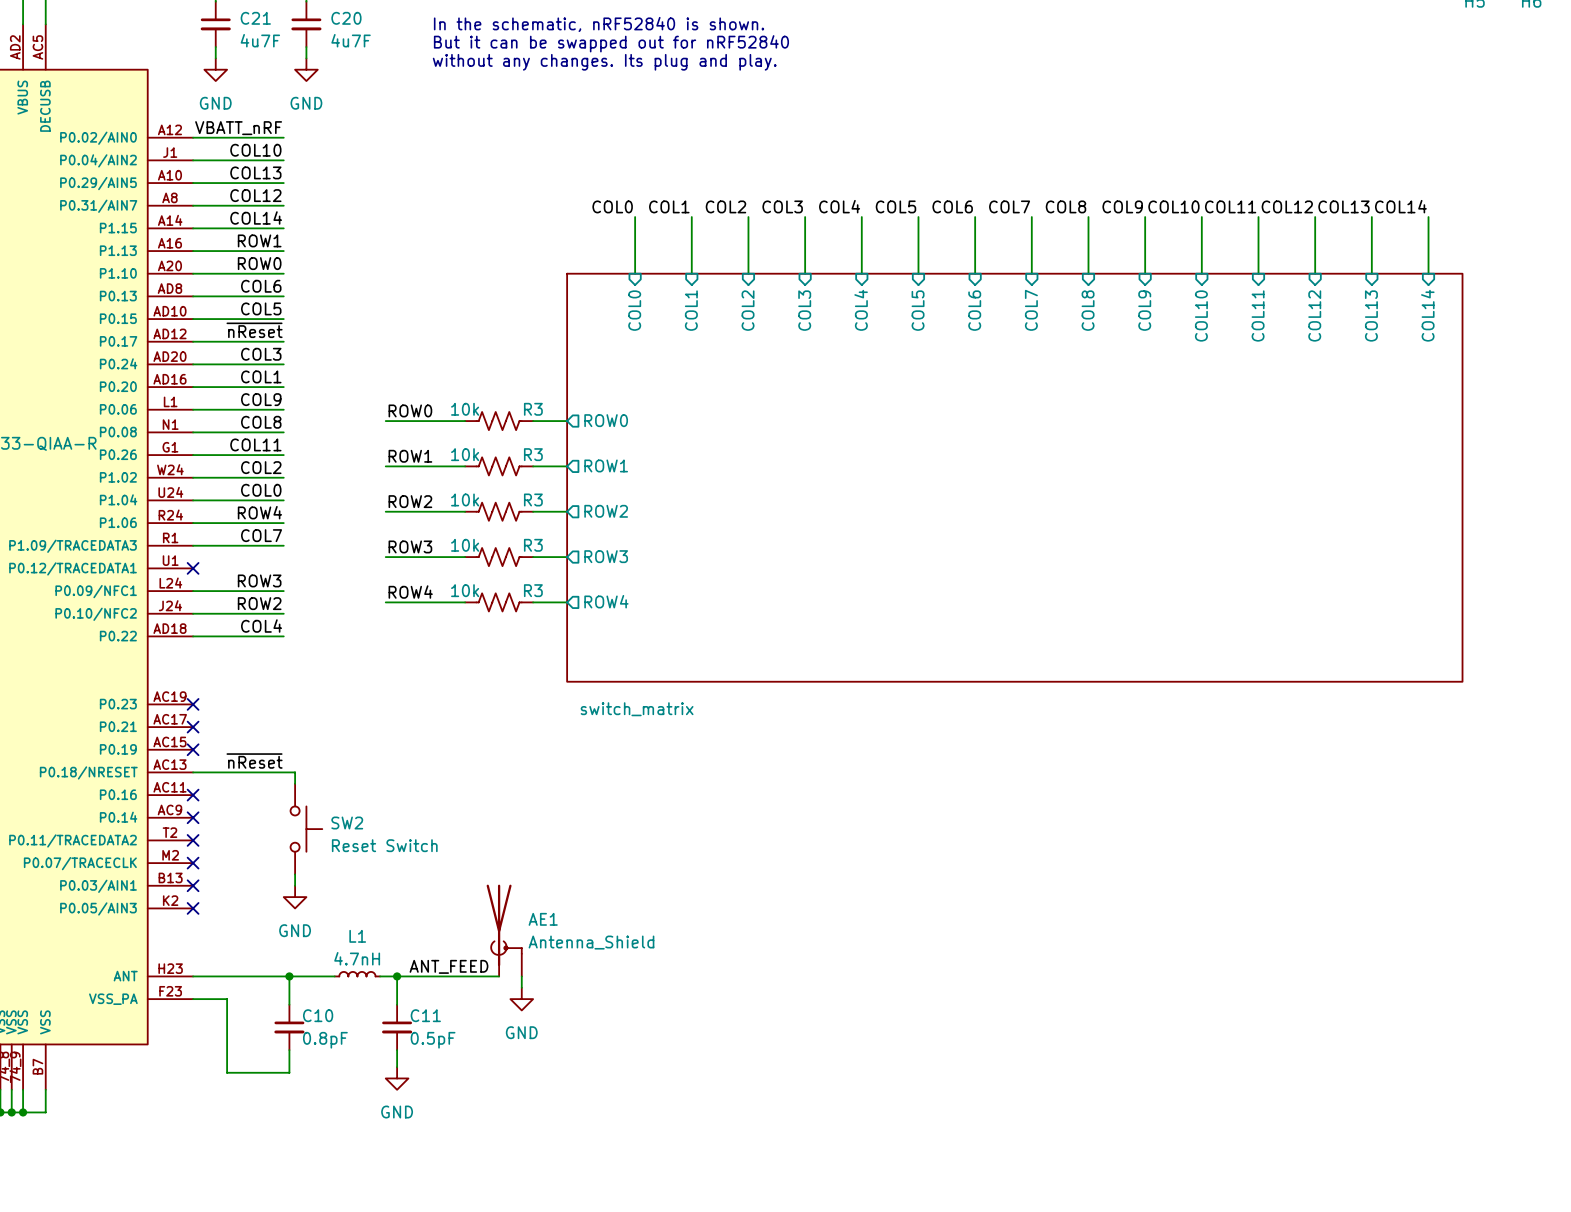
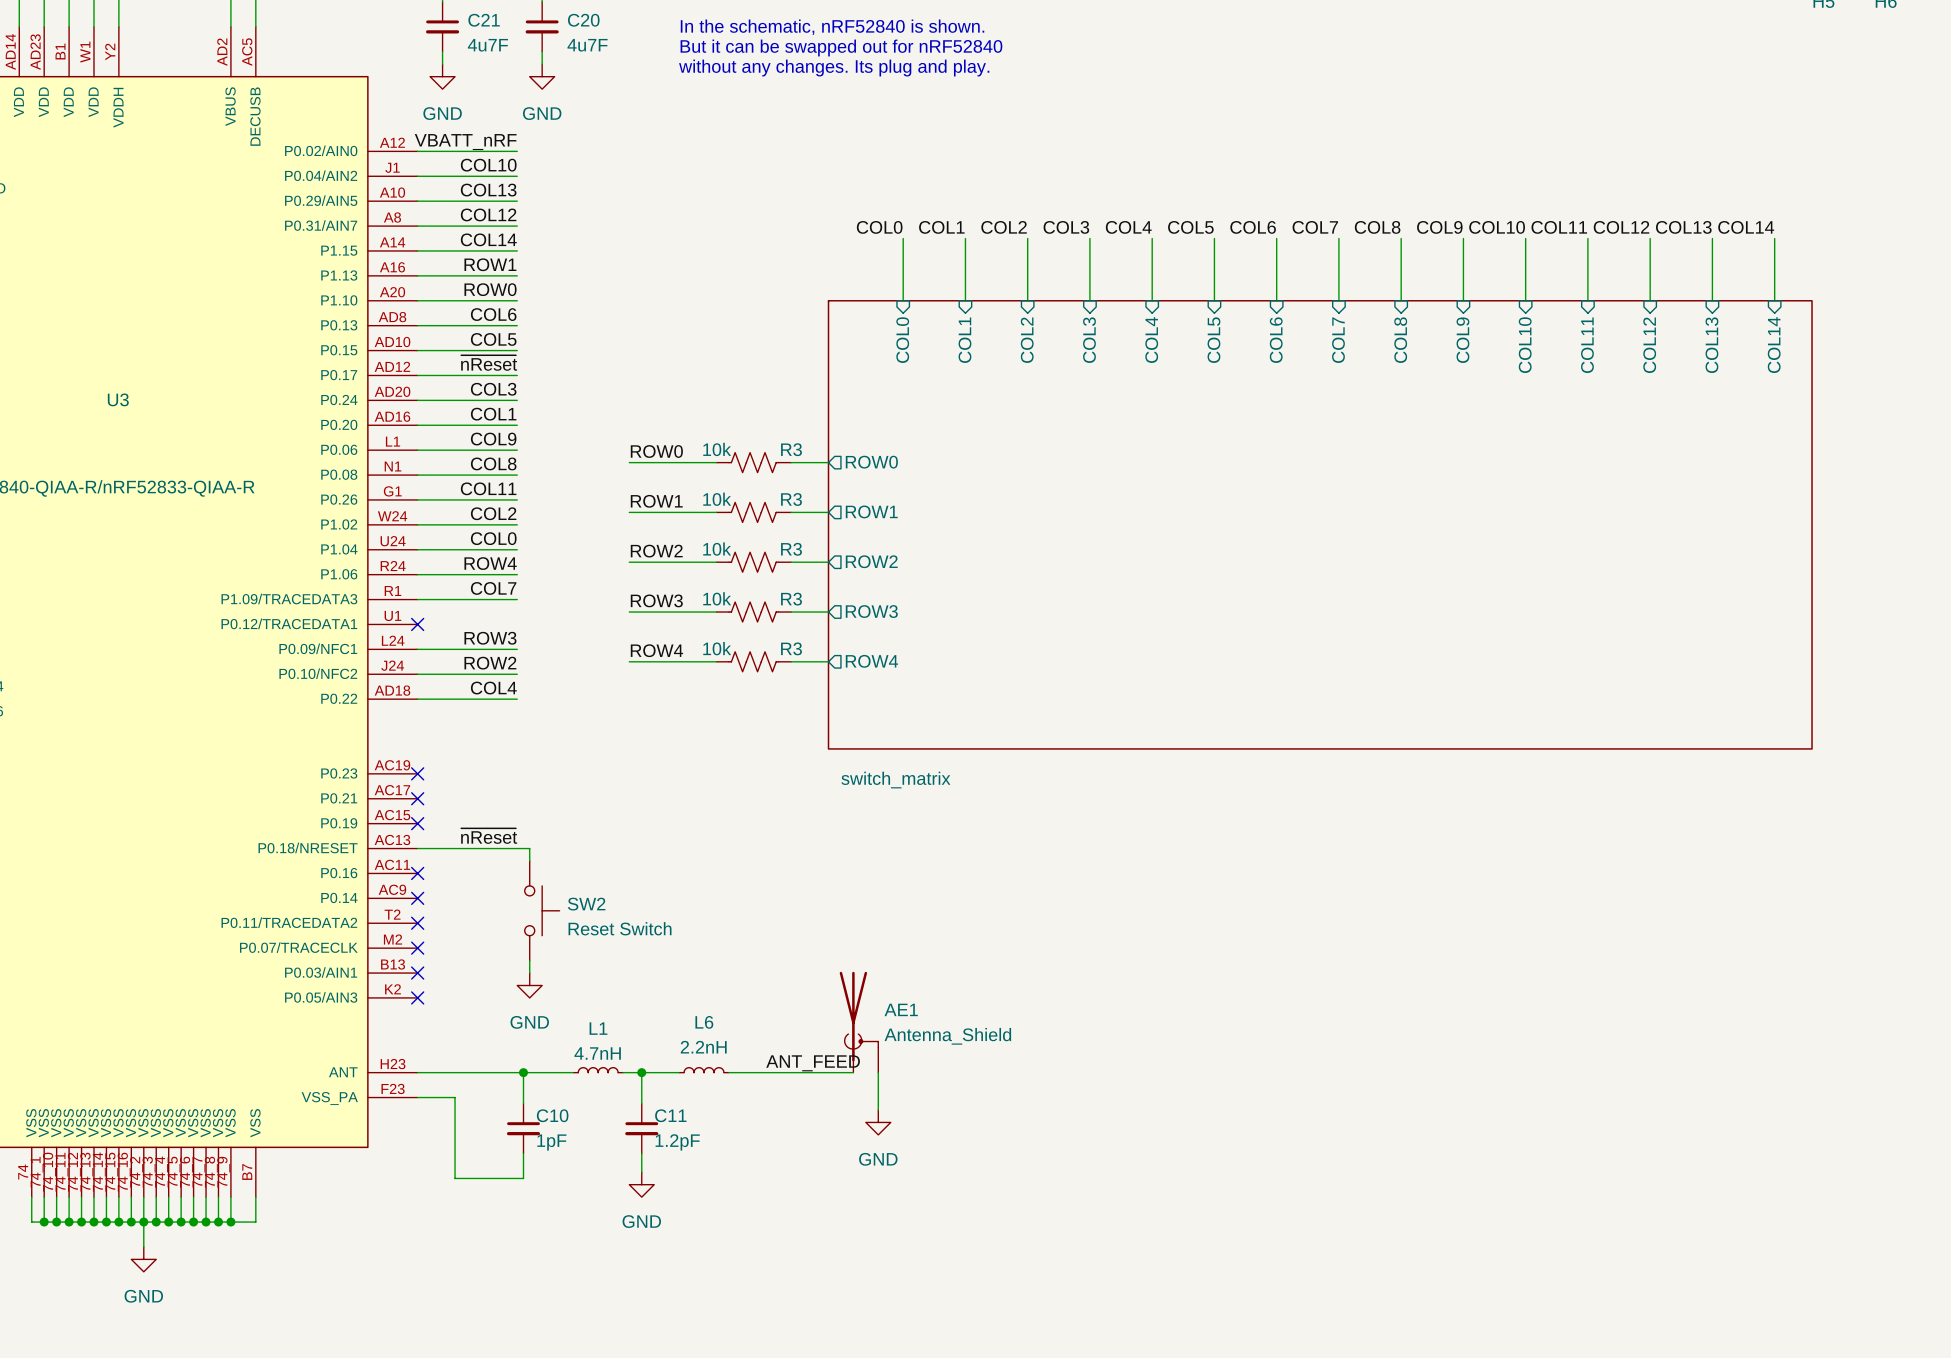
AE1 position: (504, 930) -> (859, 1022)
label position: ANT_FEED (448, 966) -> ANT_FEED (813, 1063)
L6: none -> 2.2nH (704, 1070)
wire: (431, 976) (476, 976) -> none
wire: none -> (753, 1072) (853, 1072)
wire: (521, 976) (521, 987) -> none
wire: none -> (878, 1072) (878, 1109)
power symbol position: GND (521, 999) -> GND (878, 1122)
C10 value: 0.8pF (325, 1040) -> 1pF (551, 1142)
C11 value: 0.5pF (433, 1040) -> 1.2pF (677, 1142)

